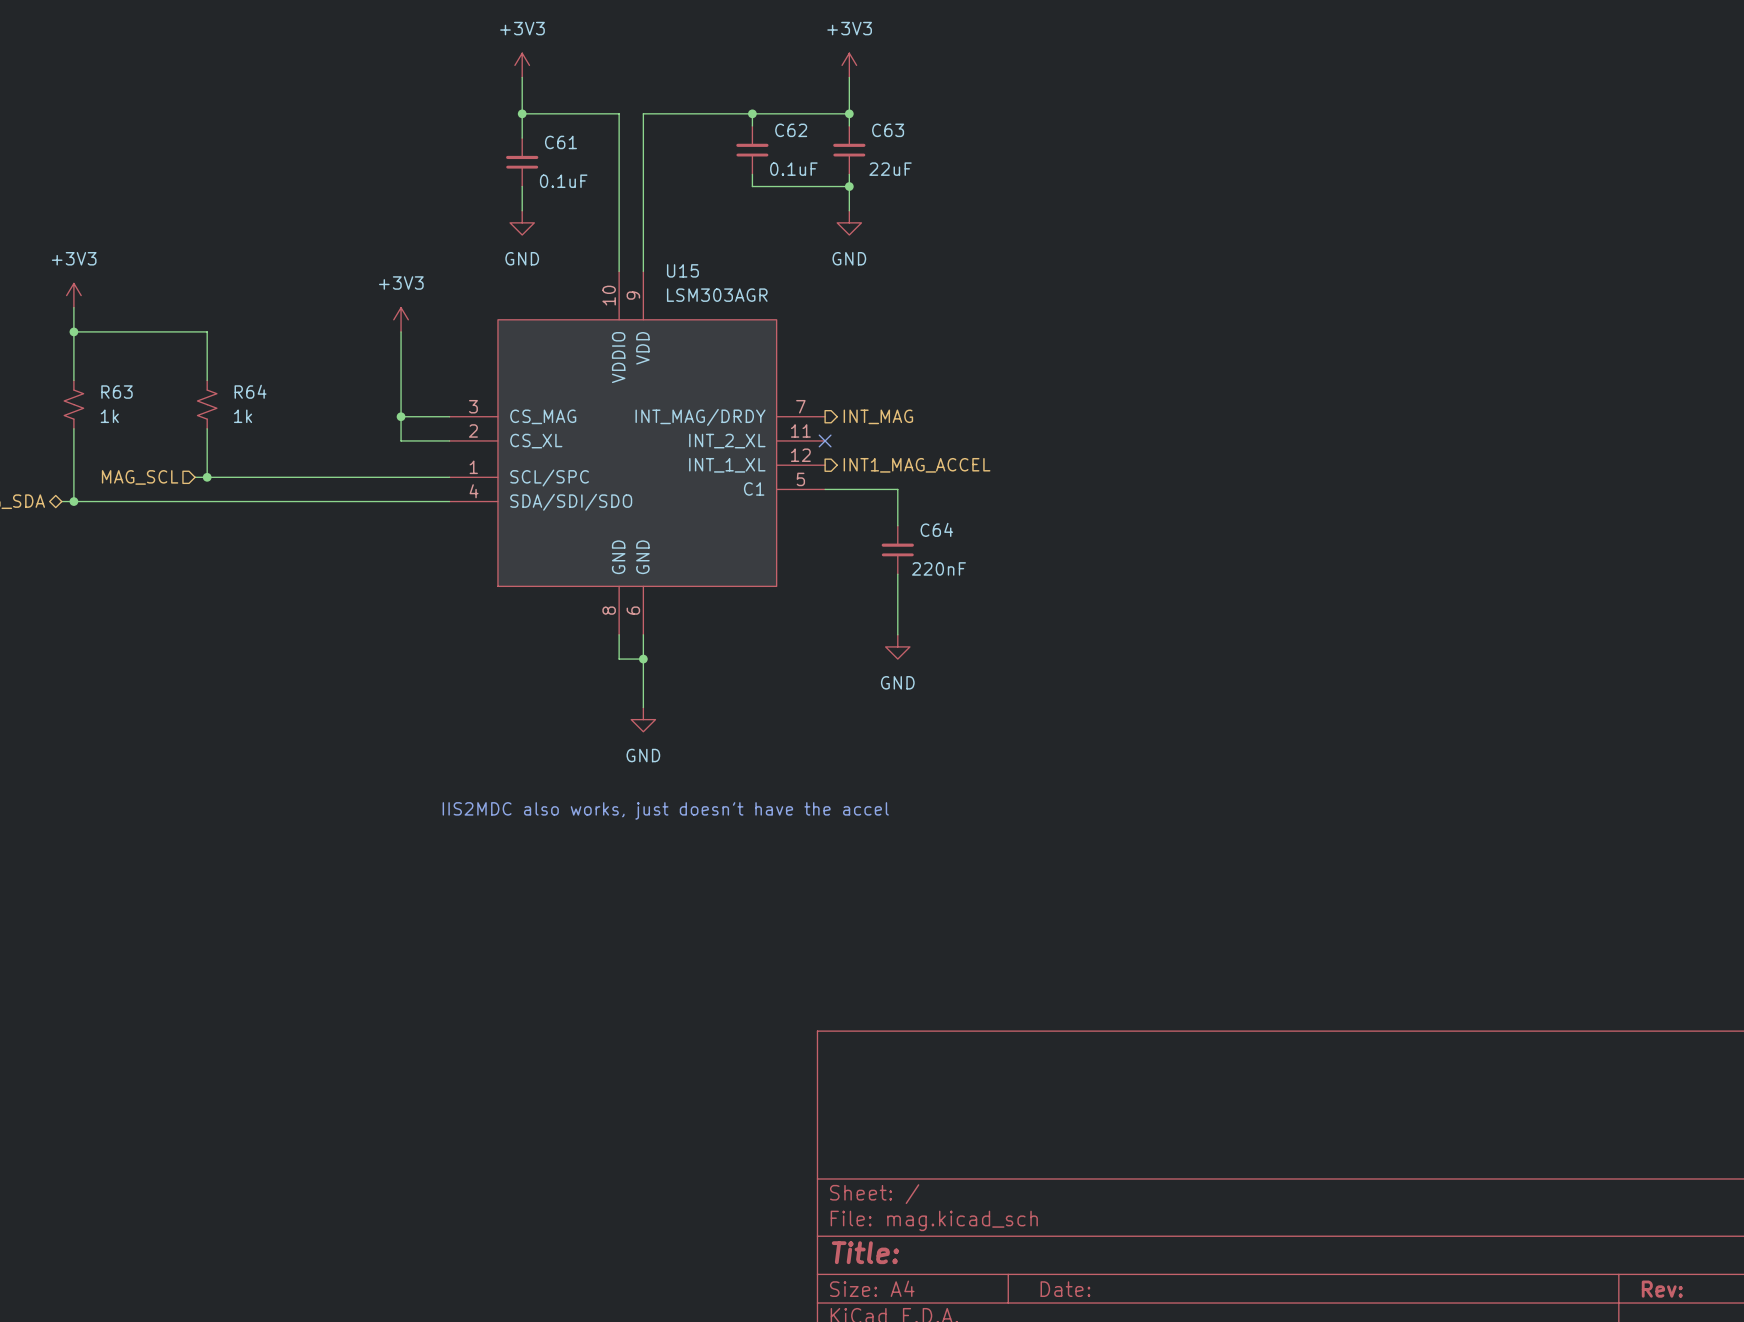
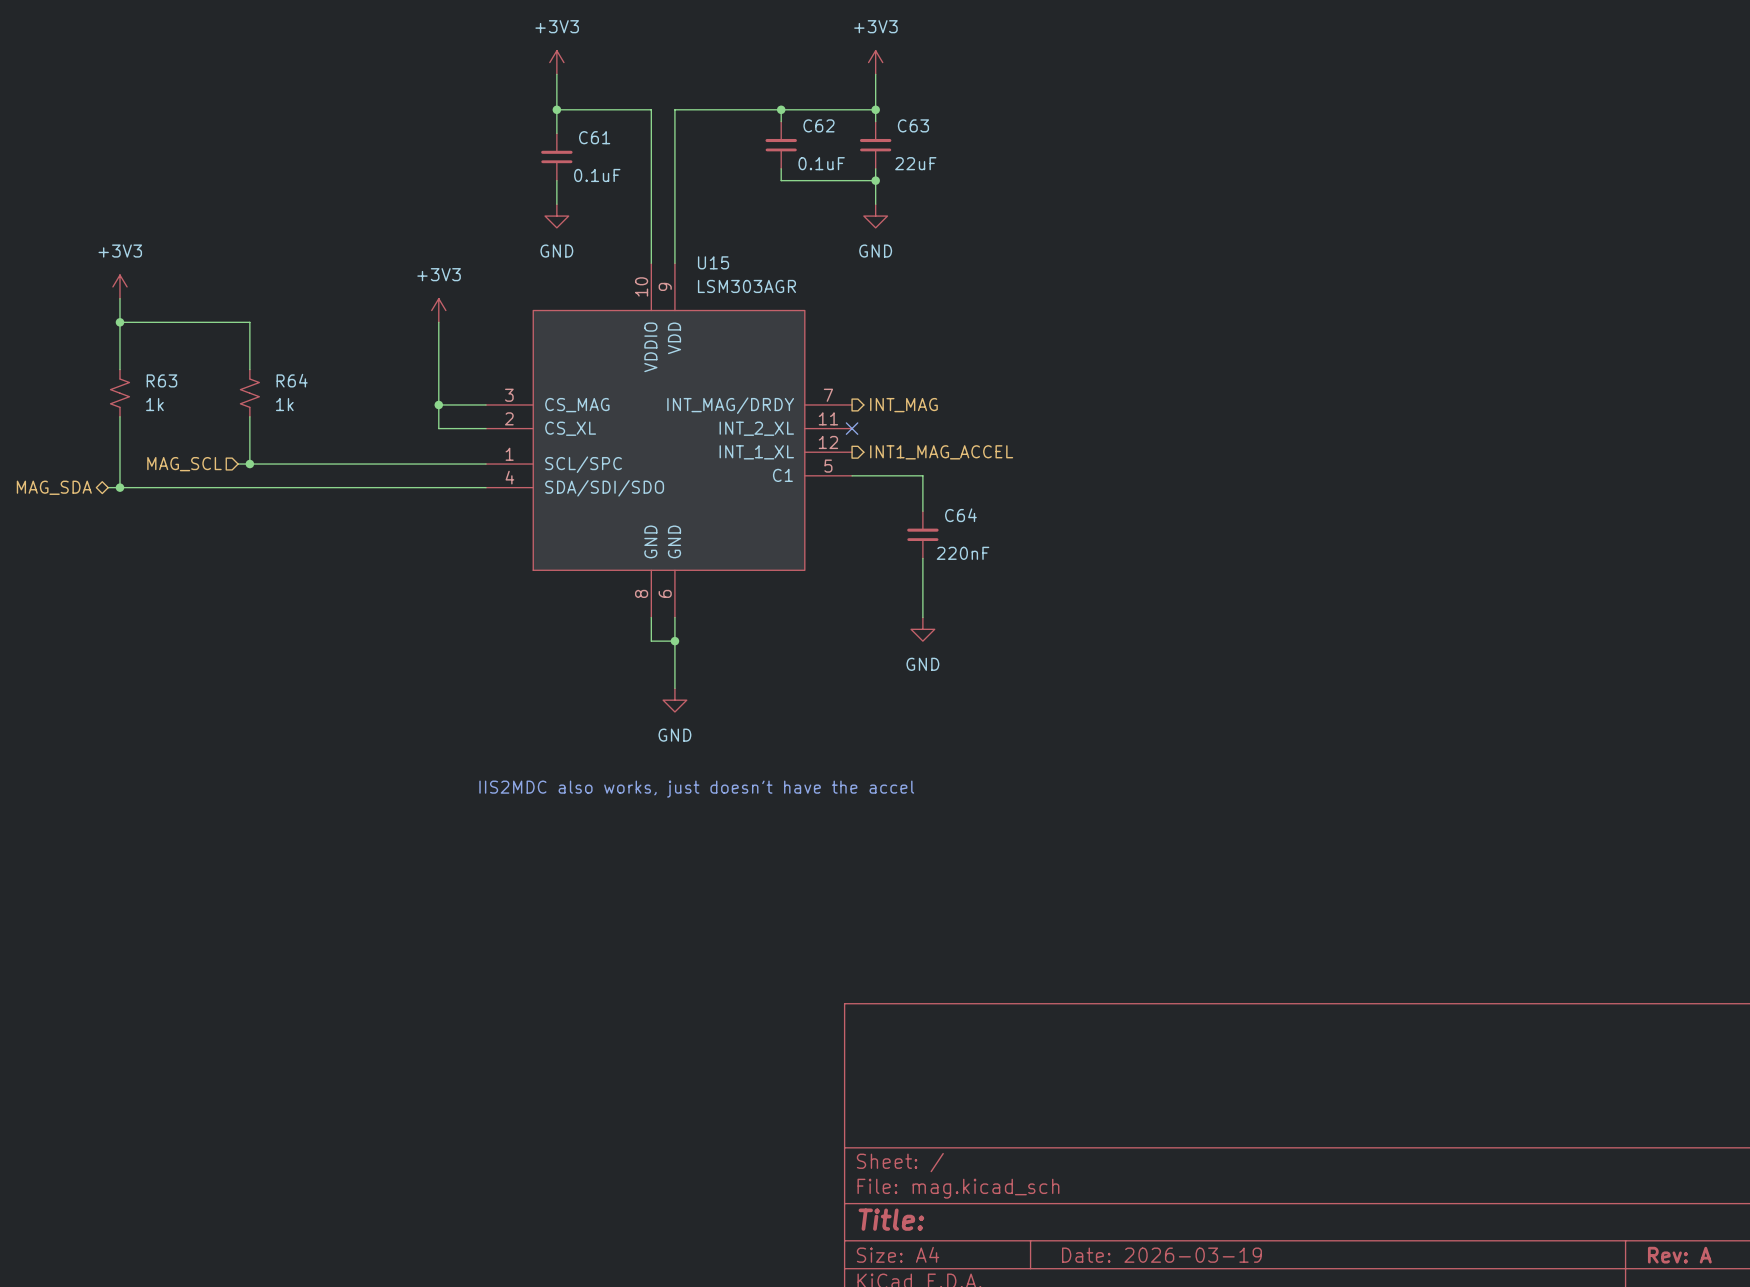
title block: Date: (1065, 1289) -> Date: 2026-03-19 (1161, 1255)
title block: Rev: (1662, 1289) -> Rev: A (1679, 1255)

